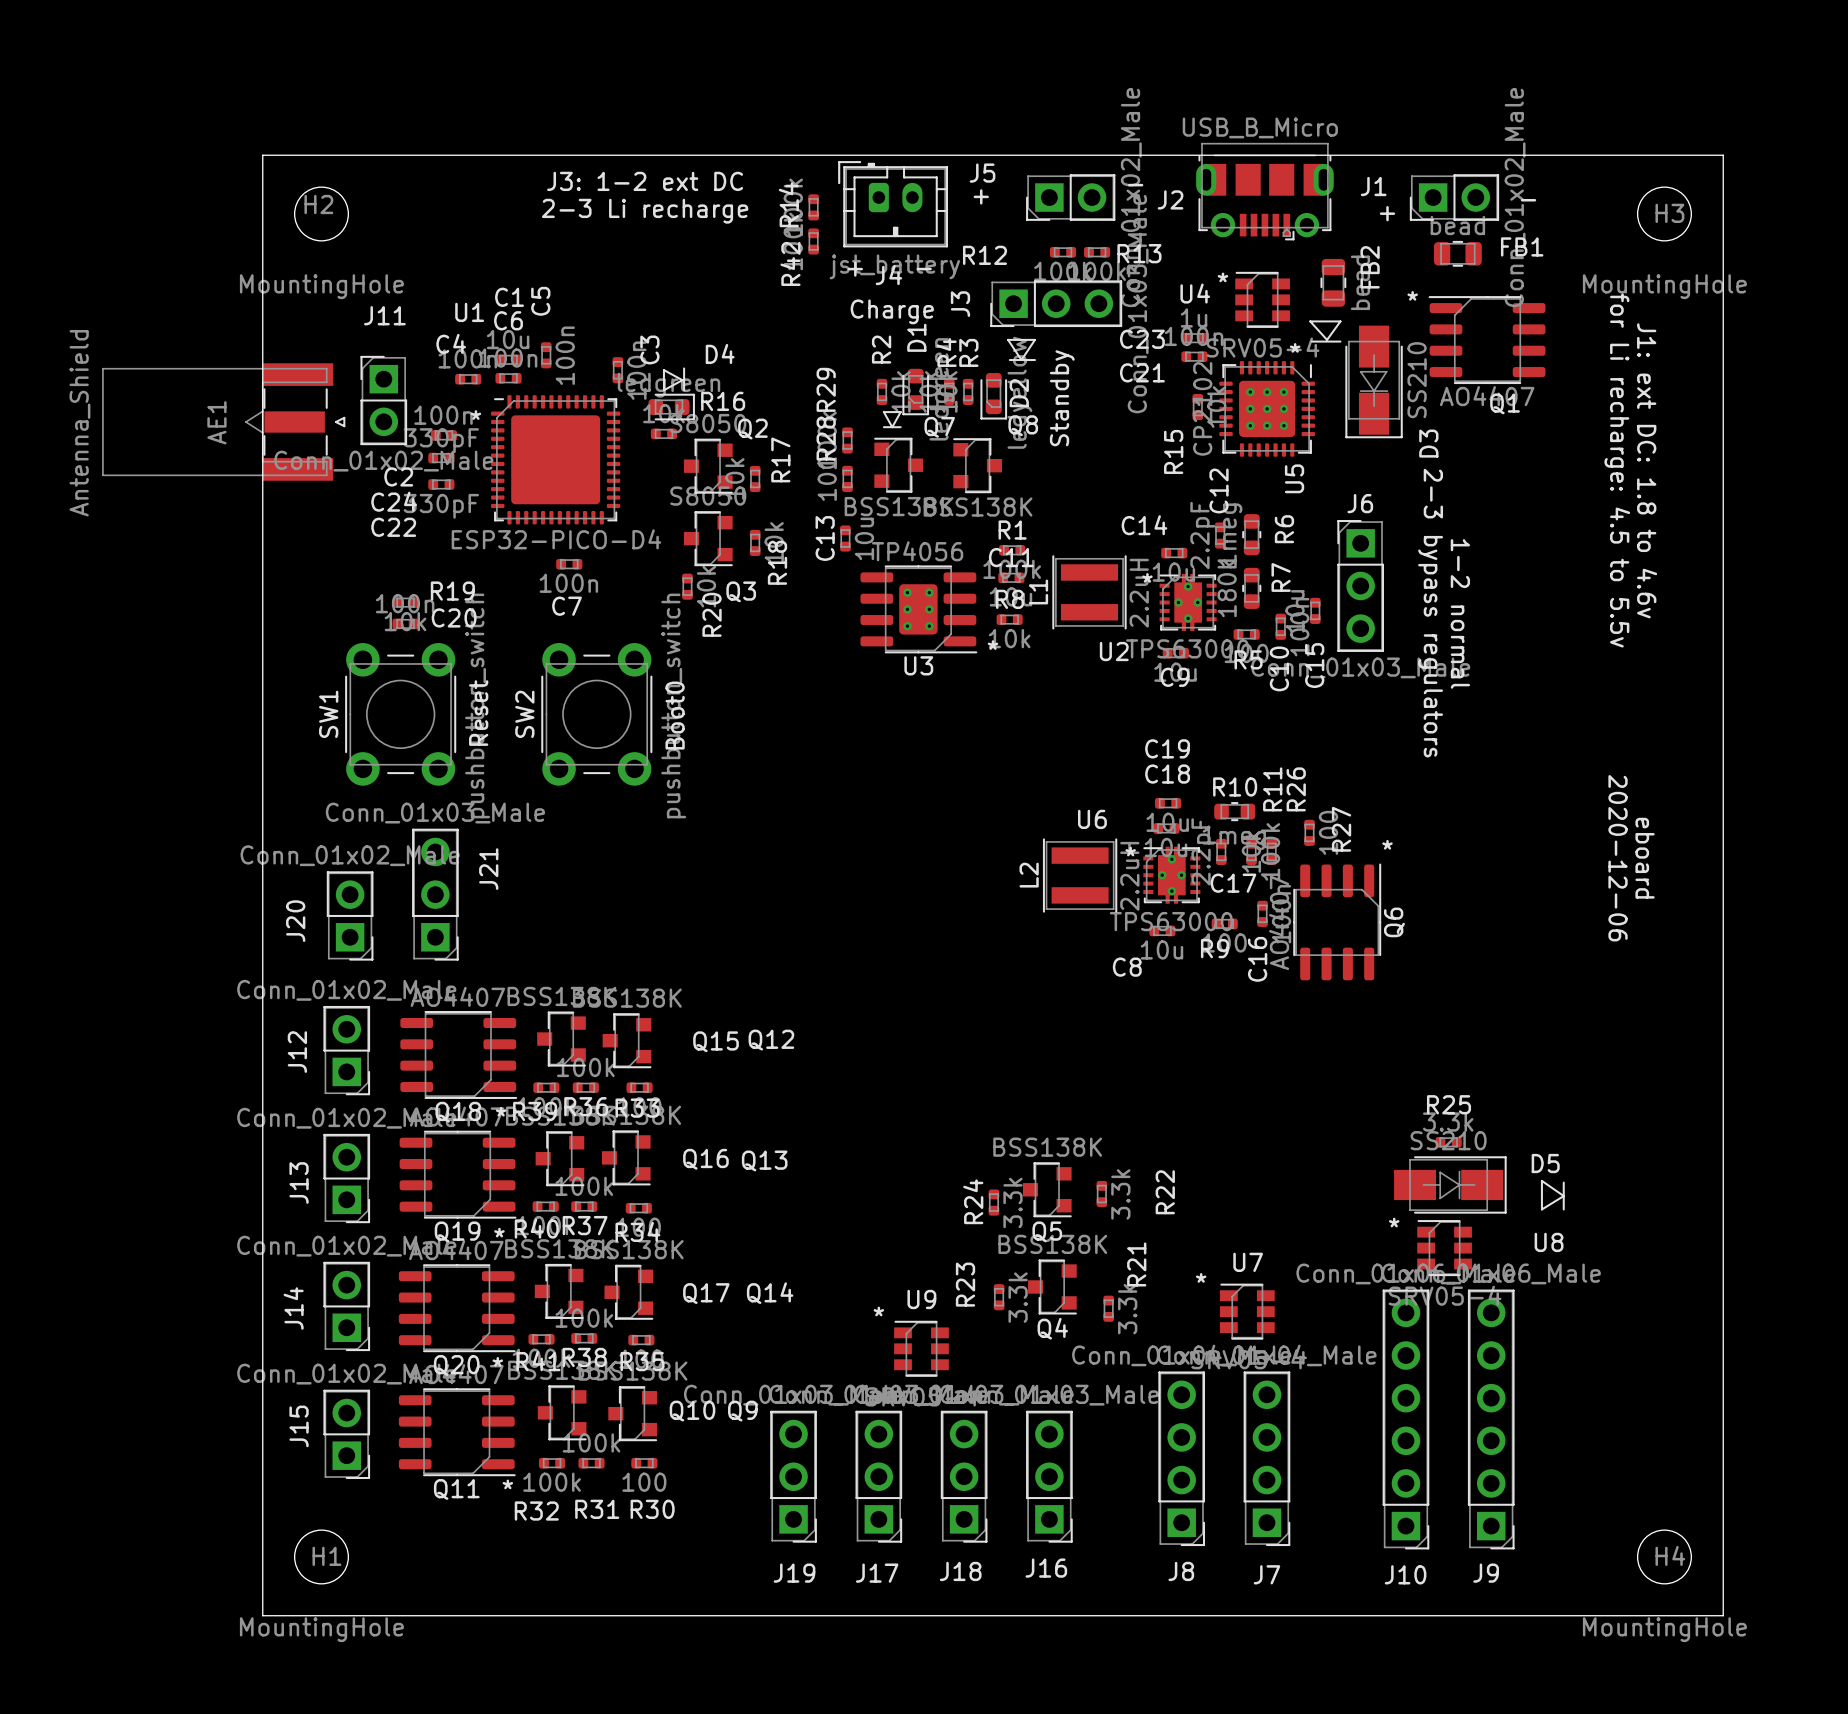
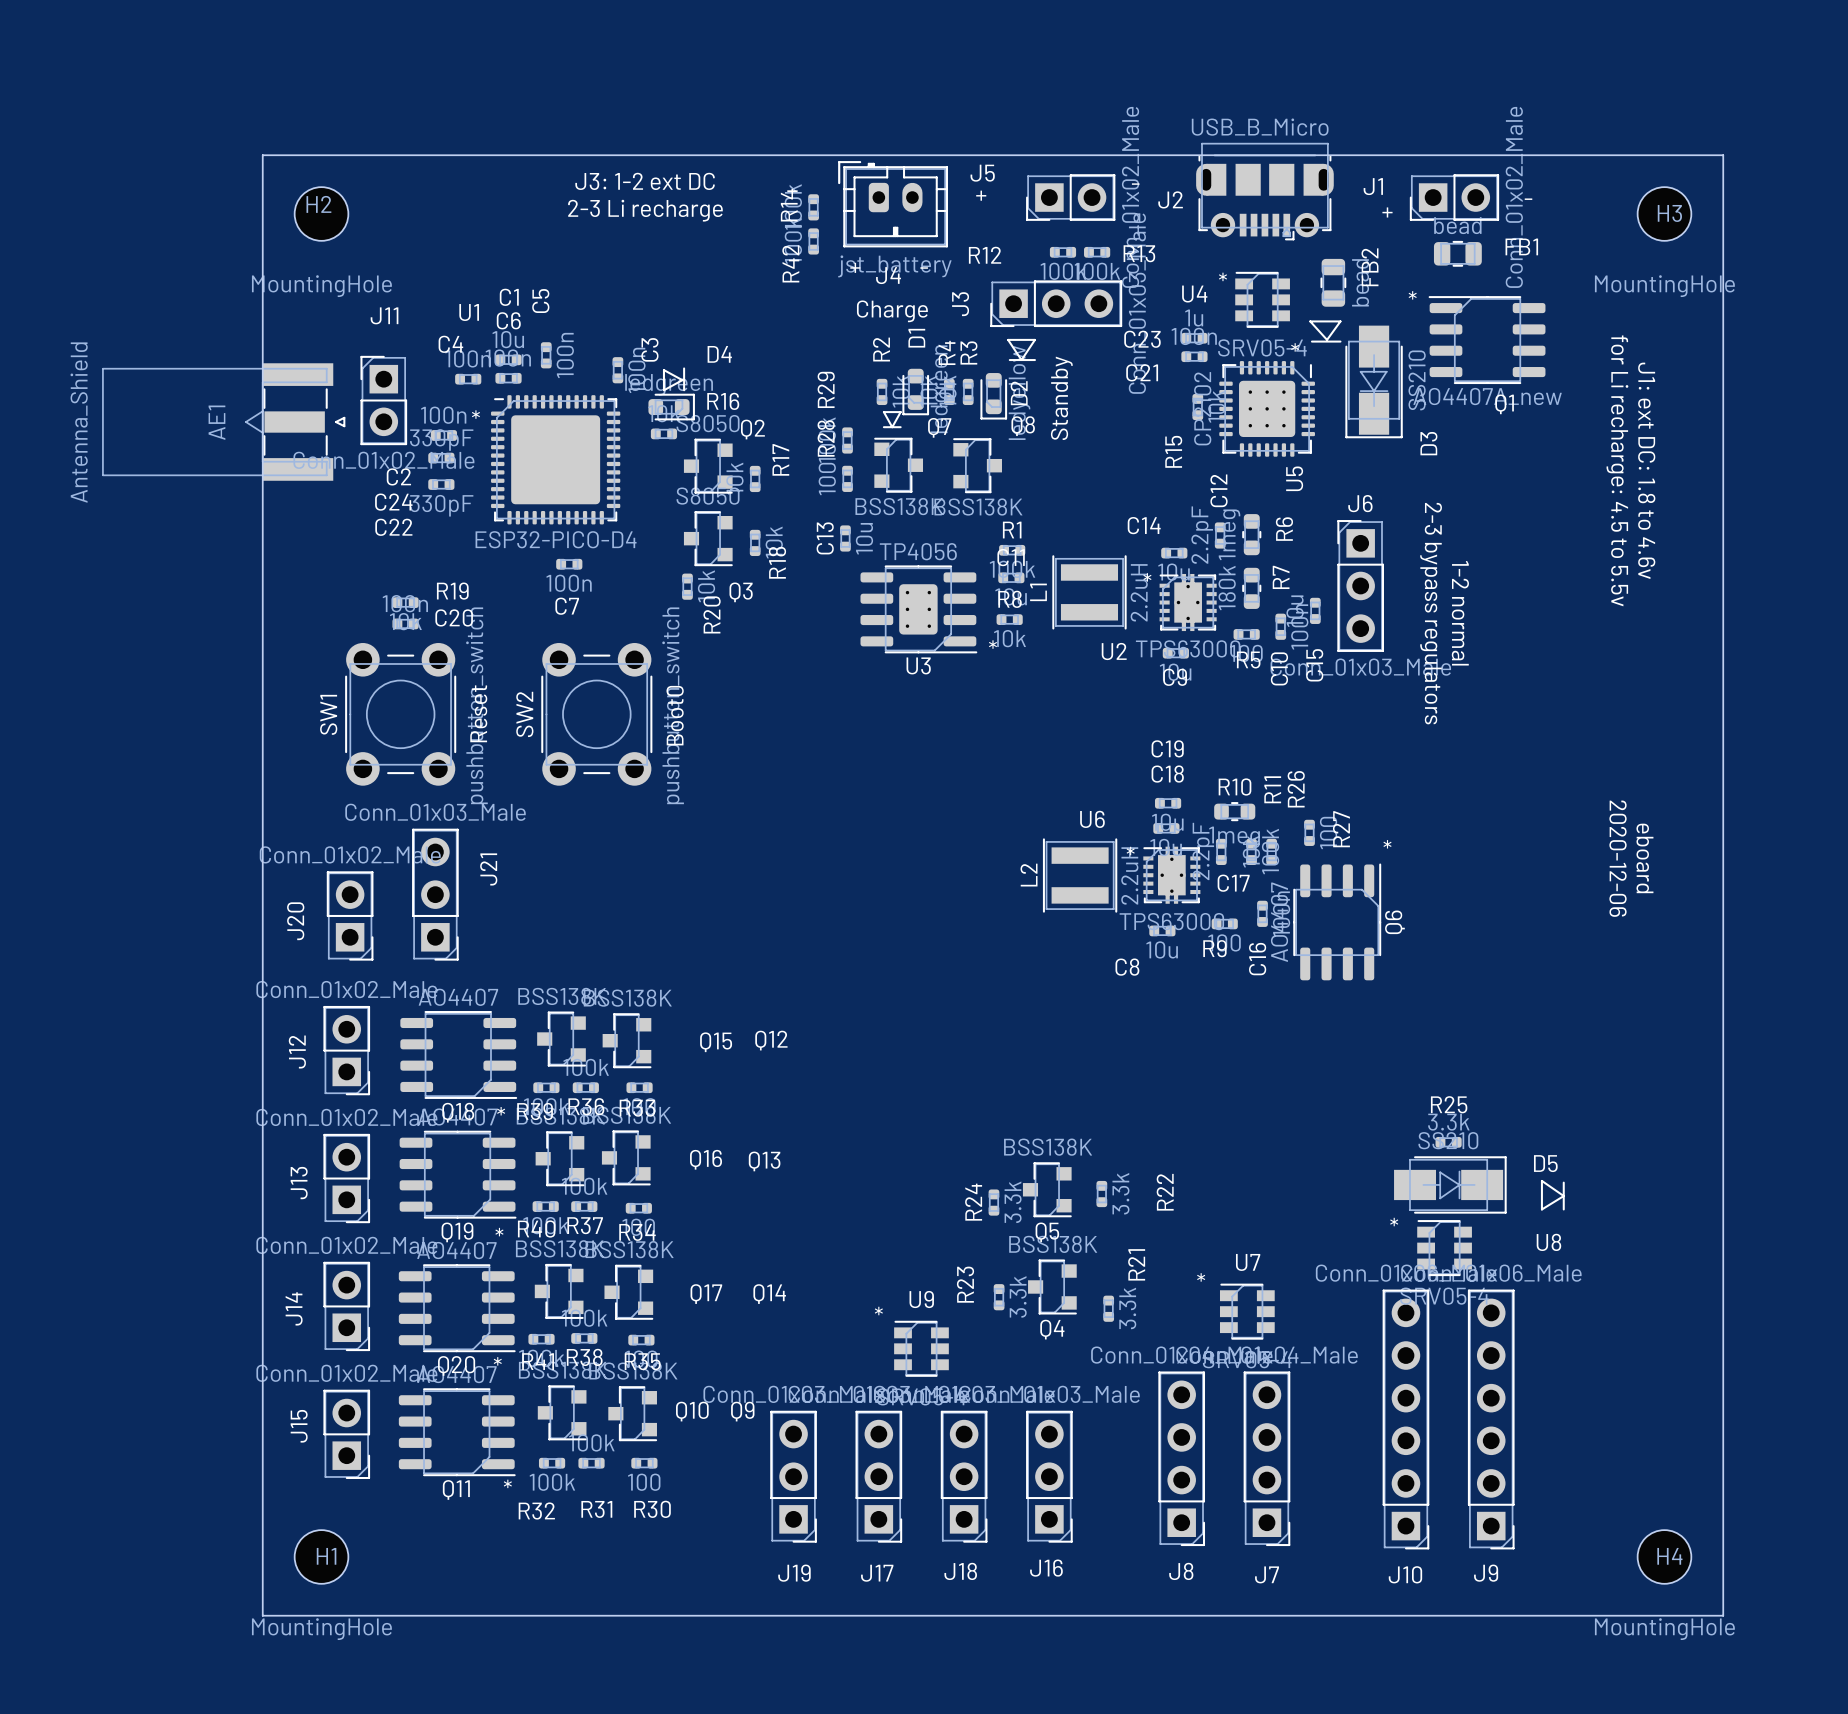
Q1 value: AO4407 (1487, 396) -> AO4407A_new (1487, 396)

